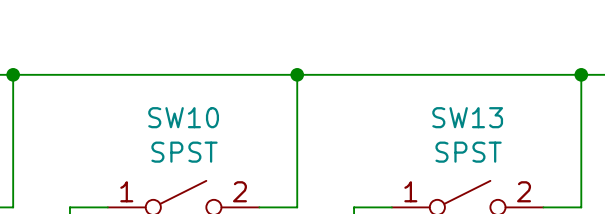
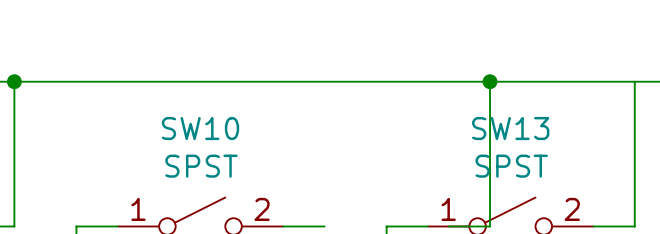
wire: (297, 74) (297, 207) -> none
junction: (297, 74) -> none
wire: none -> (490, 81) (490, 226) (448, 226)
junction: none -> (490, 81)
junction: (581, 74) -> none

